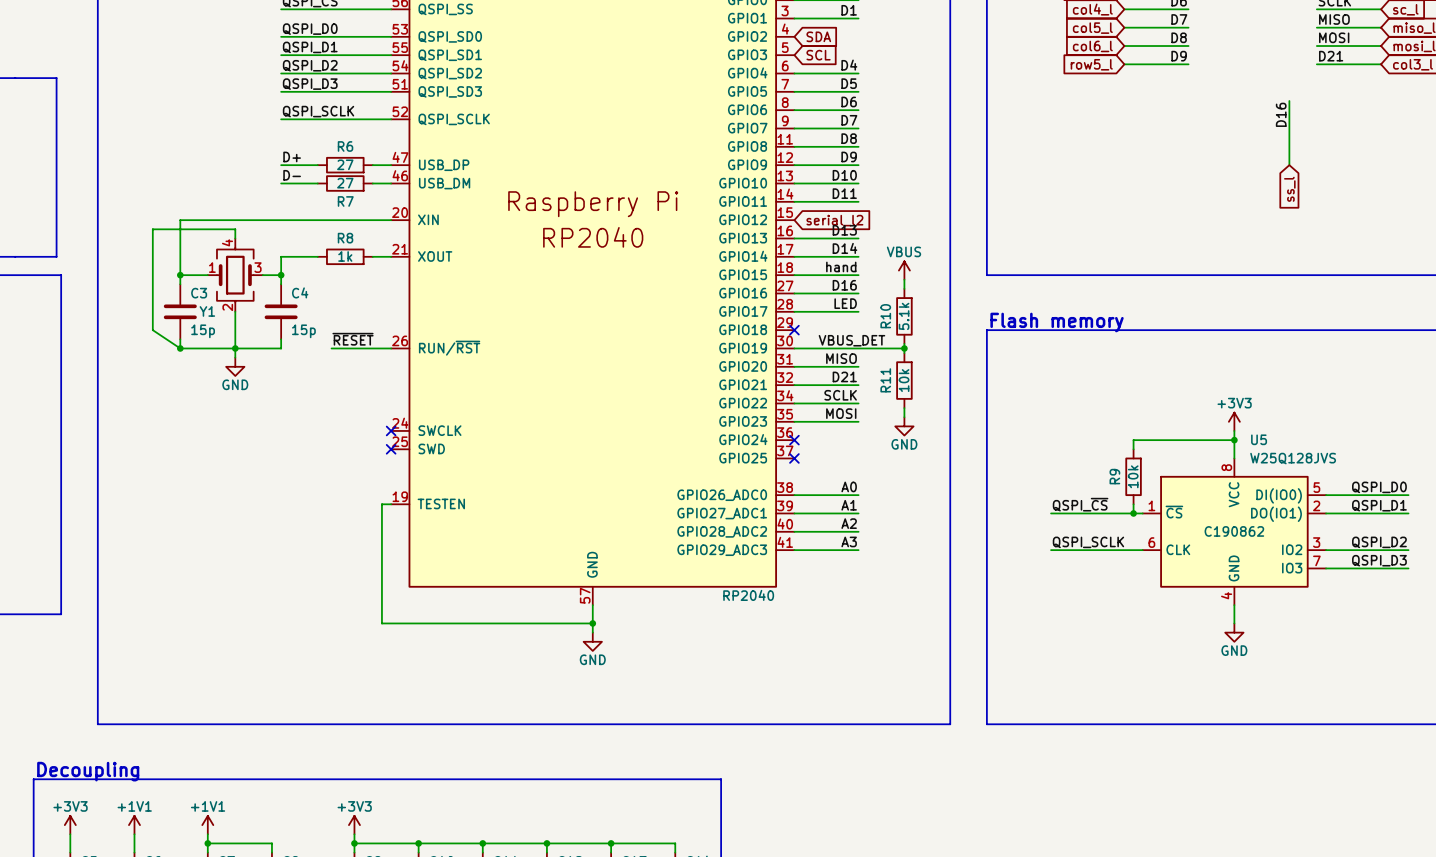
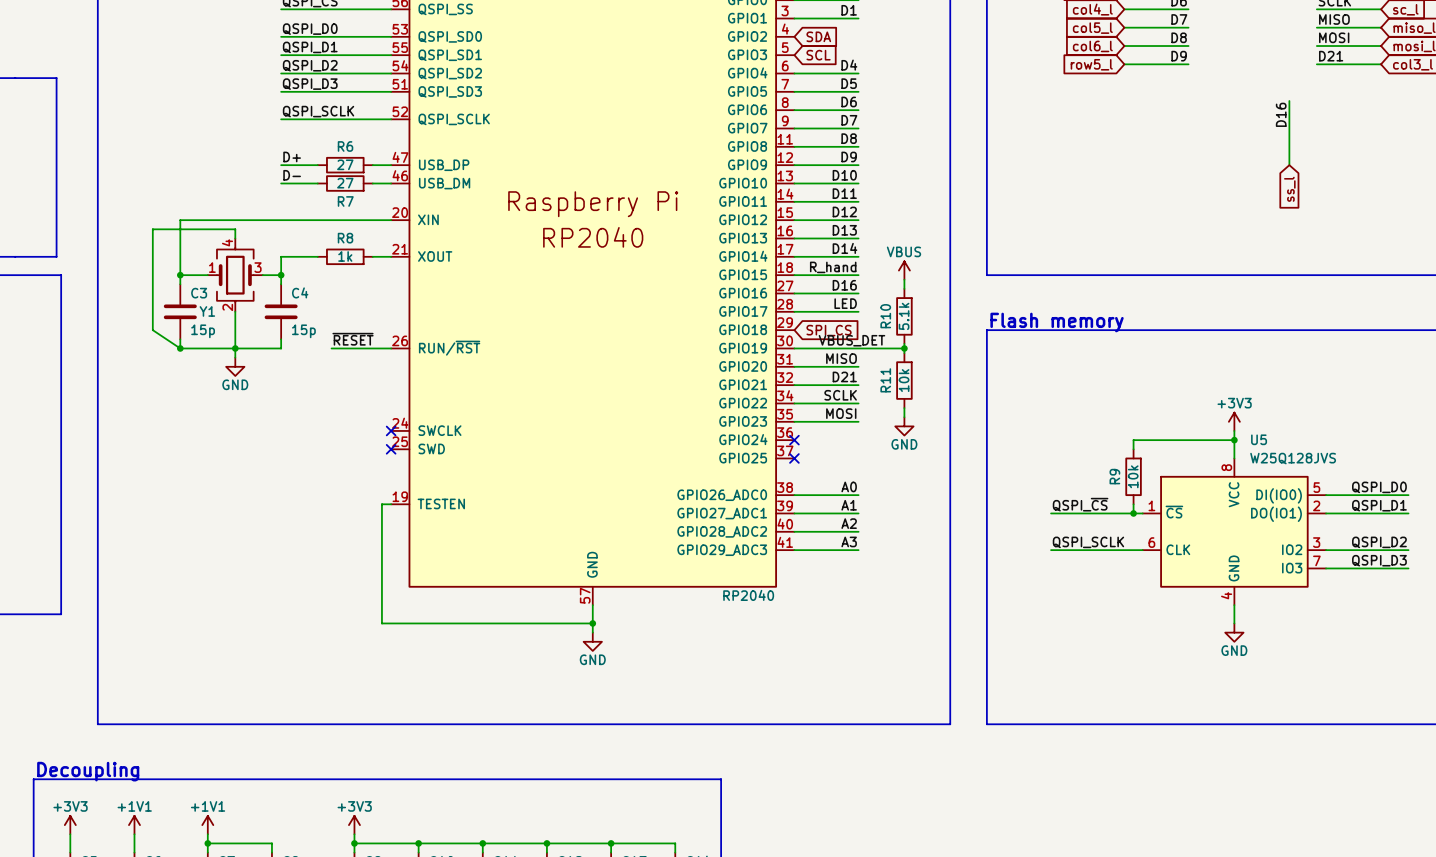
label: none -> D12 (844, 211)
wire: none -> (794, 220) (858, 220)
global label: serial_l2 (834, 220) -> none
label: hand (841, 266) -> R_hand (833, 267)
no-connect mark: (794, 330) -> none
global label: none -> SPI_CS (829, 330)
U5 text: C190862 (1234, 531) -> none

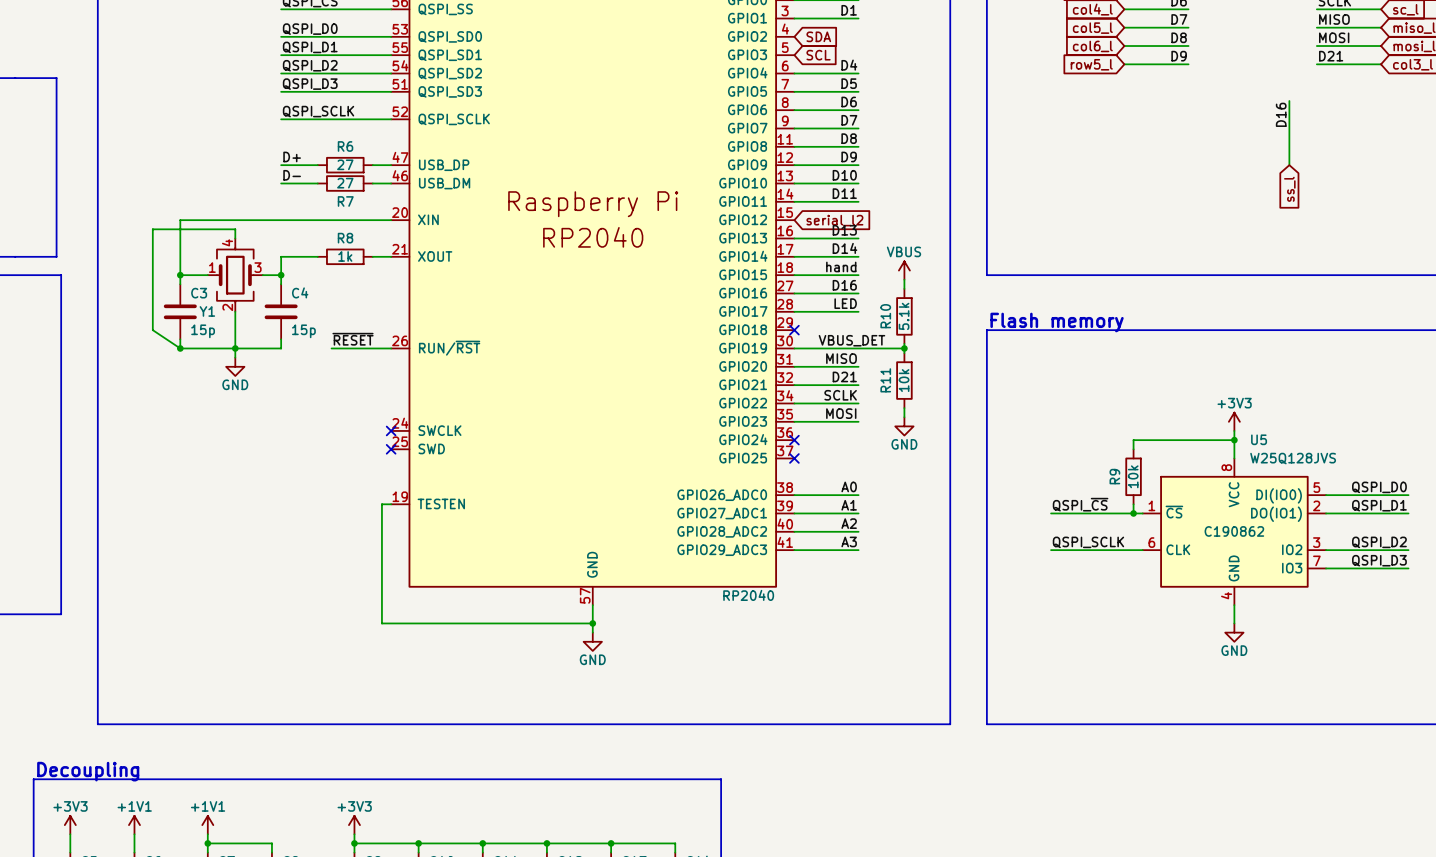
label: D12 (844, 211) -> none
wire: (794, 220) (858, 220) -> none
global label: none -> serial_l2 (834, 220)
label: R_hand (833, 267) -> hand (841, 266)
no-connect mark: none -> (794, 330)
global label: SPI_CS (829, 330) -> none
U5 text: none -> C190862 (1234, 531)

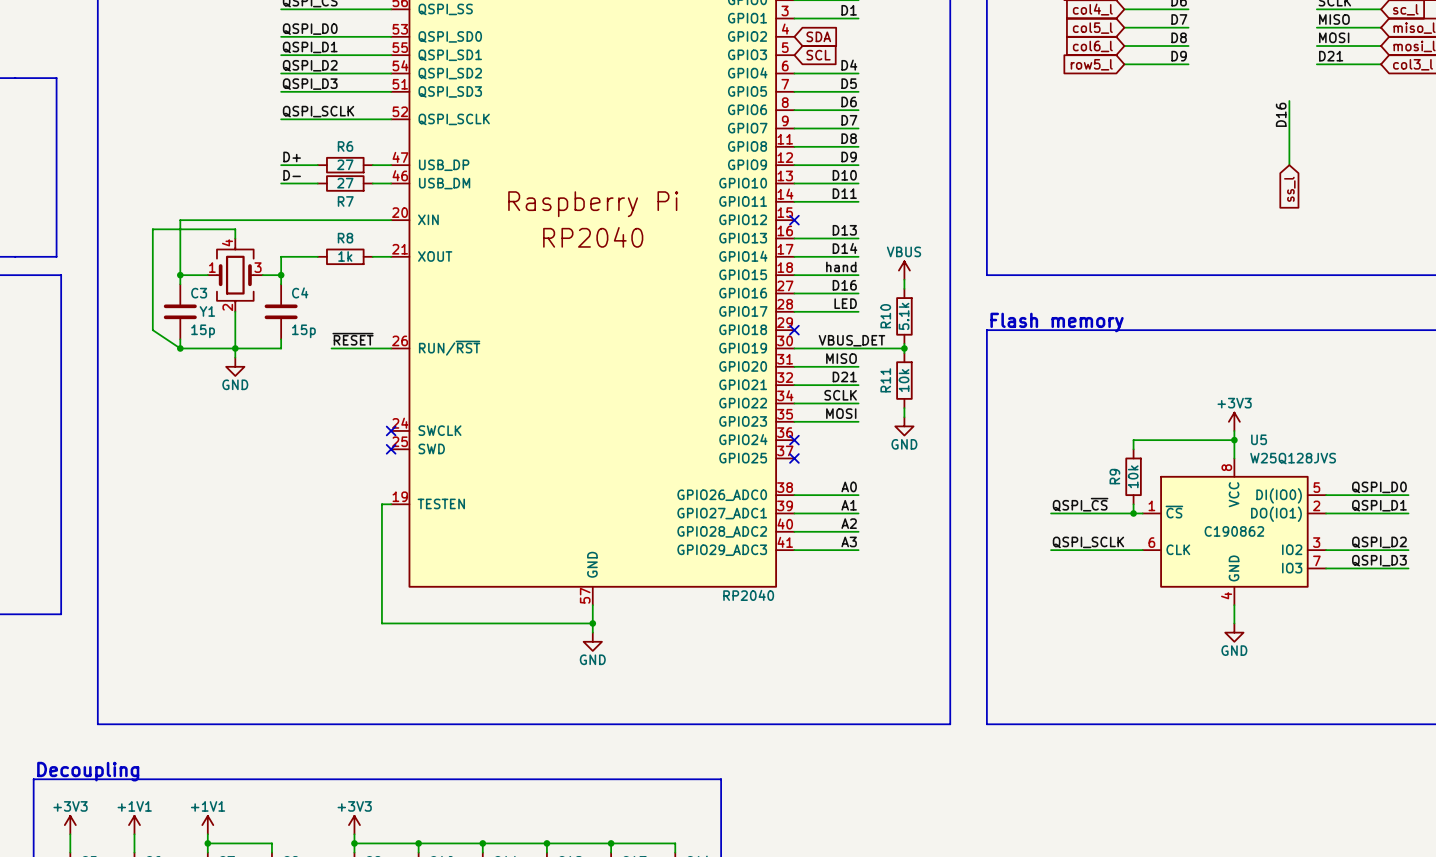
no-connect mark: none -> (794, 220)
global label: serial_l2 (834, 220) -> none

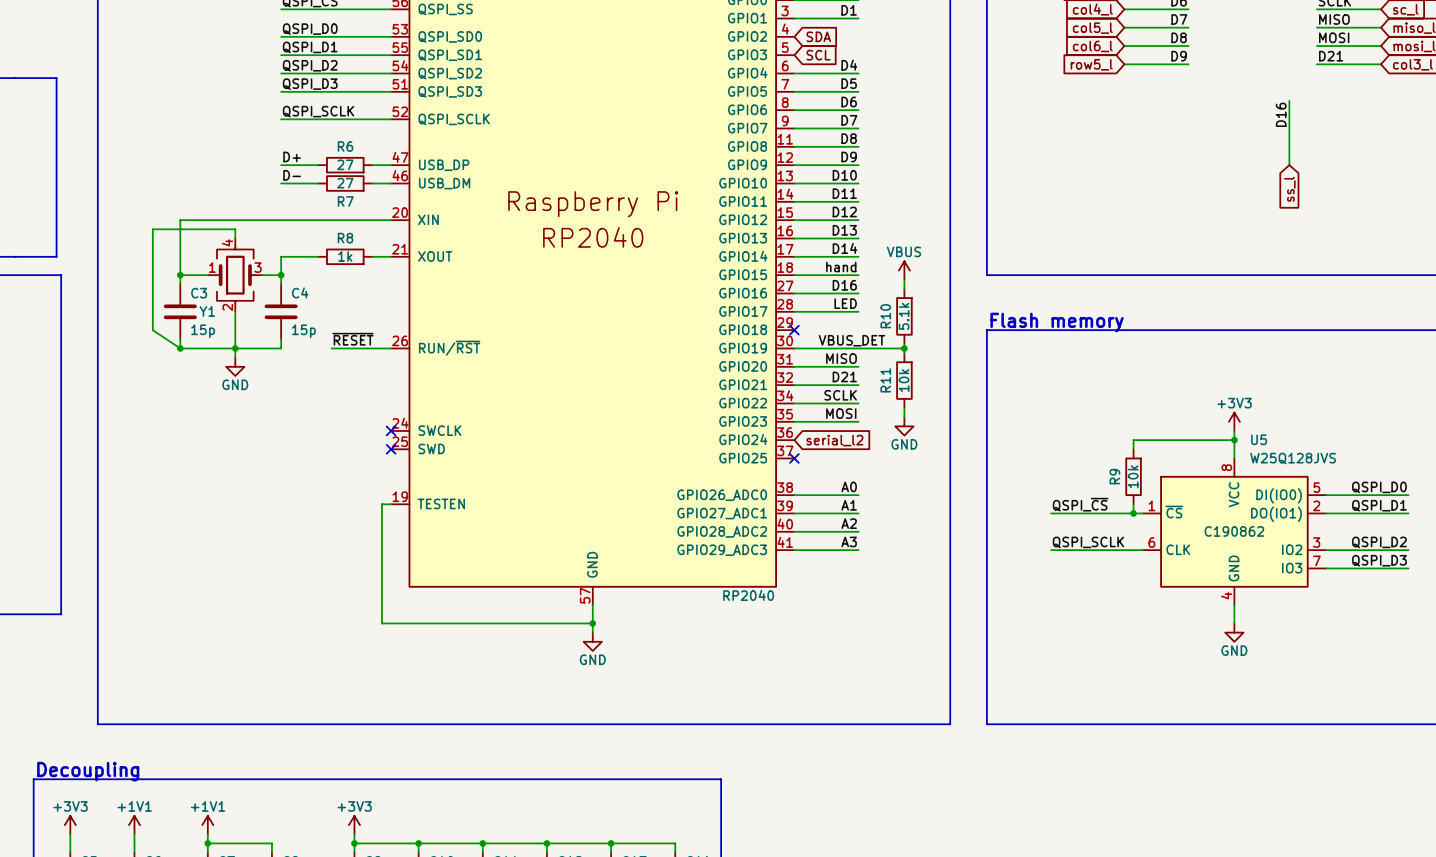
label: none -> D12 (844, 211)
wire: none -> (794, 220) (858, 220)
no-connect mark: (794, 220) -> none
no-connect mark: (794, 440) -> none
global label: none -> serial_l2 (834, 440)

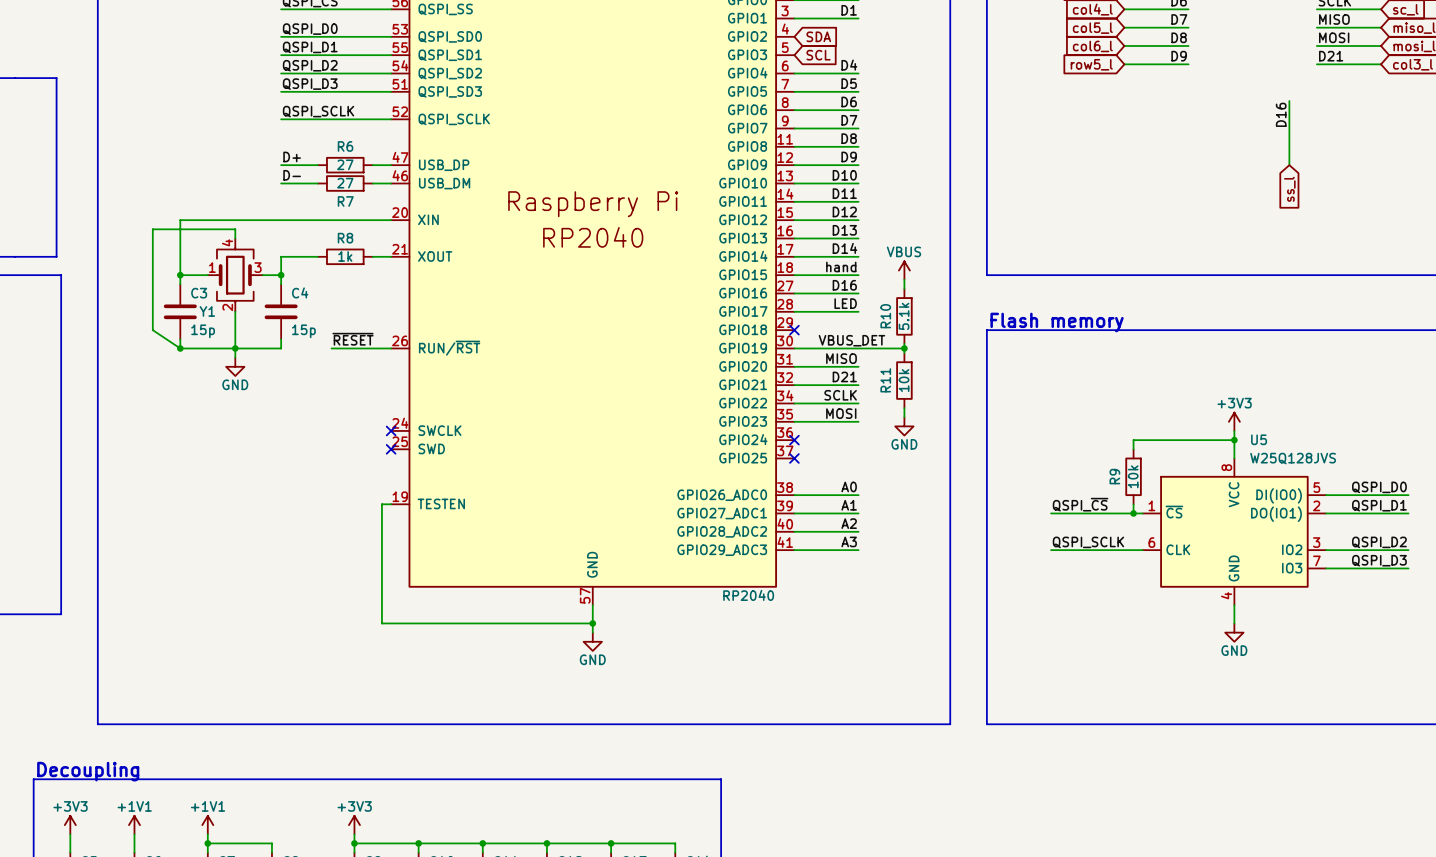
no-connect mark: none -> (794, 440)
global label: serial_l2 (834, 440) -> none
U5 text: C190862 (1234, 531) -> none

